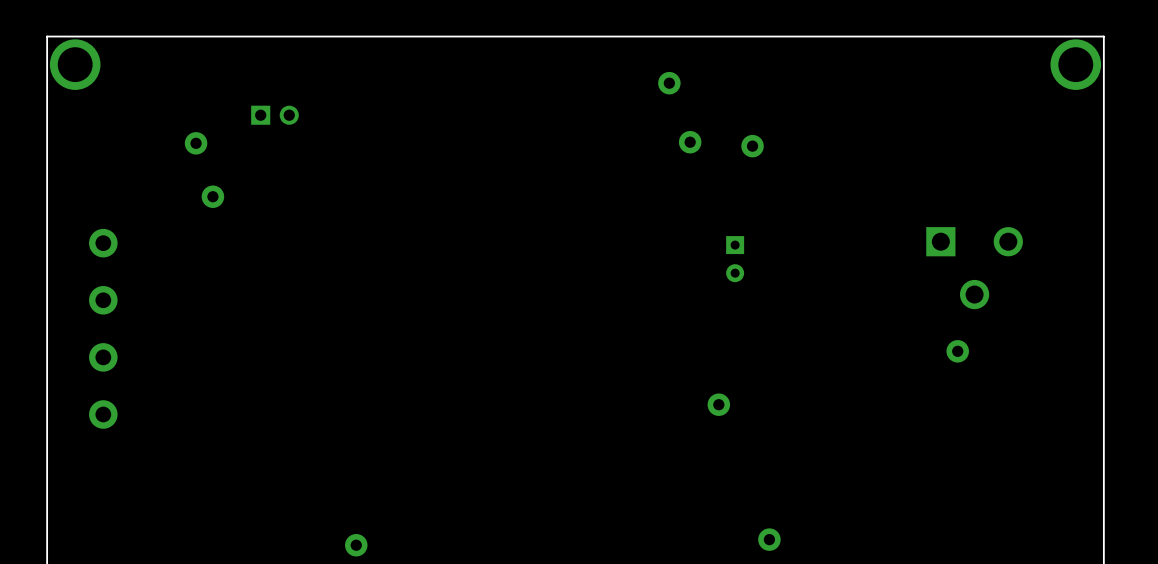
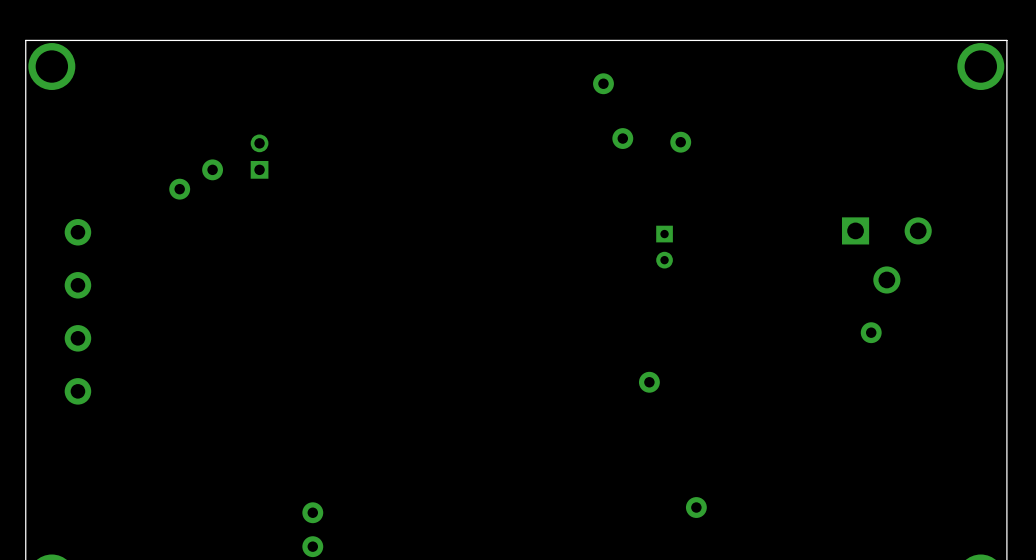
part rotation: 0° (274, 115) -> 90° counterclockwise (259, 156)
part position: (274, 115) -> (259, 156)
part position: (196, 143) -> (212, 169)

